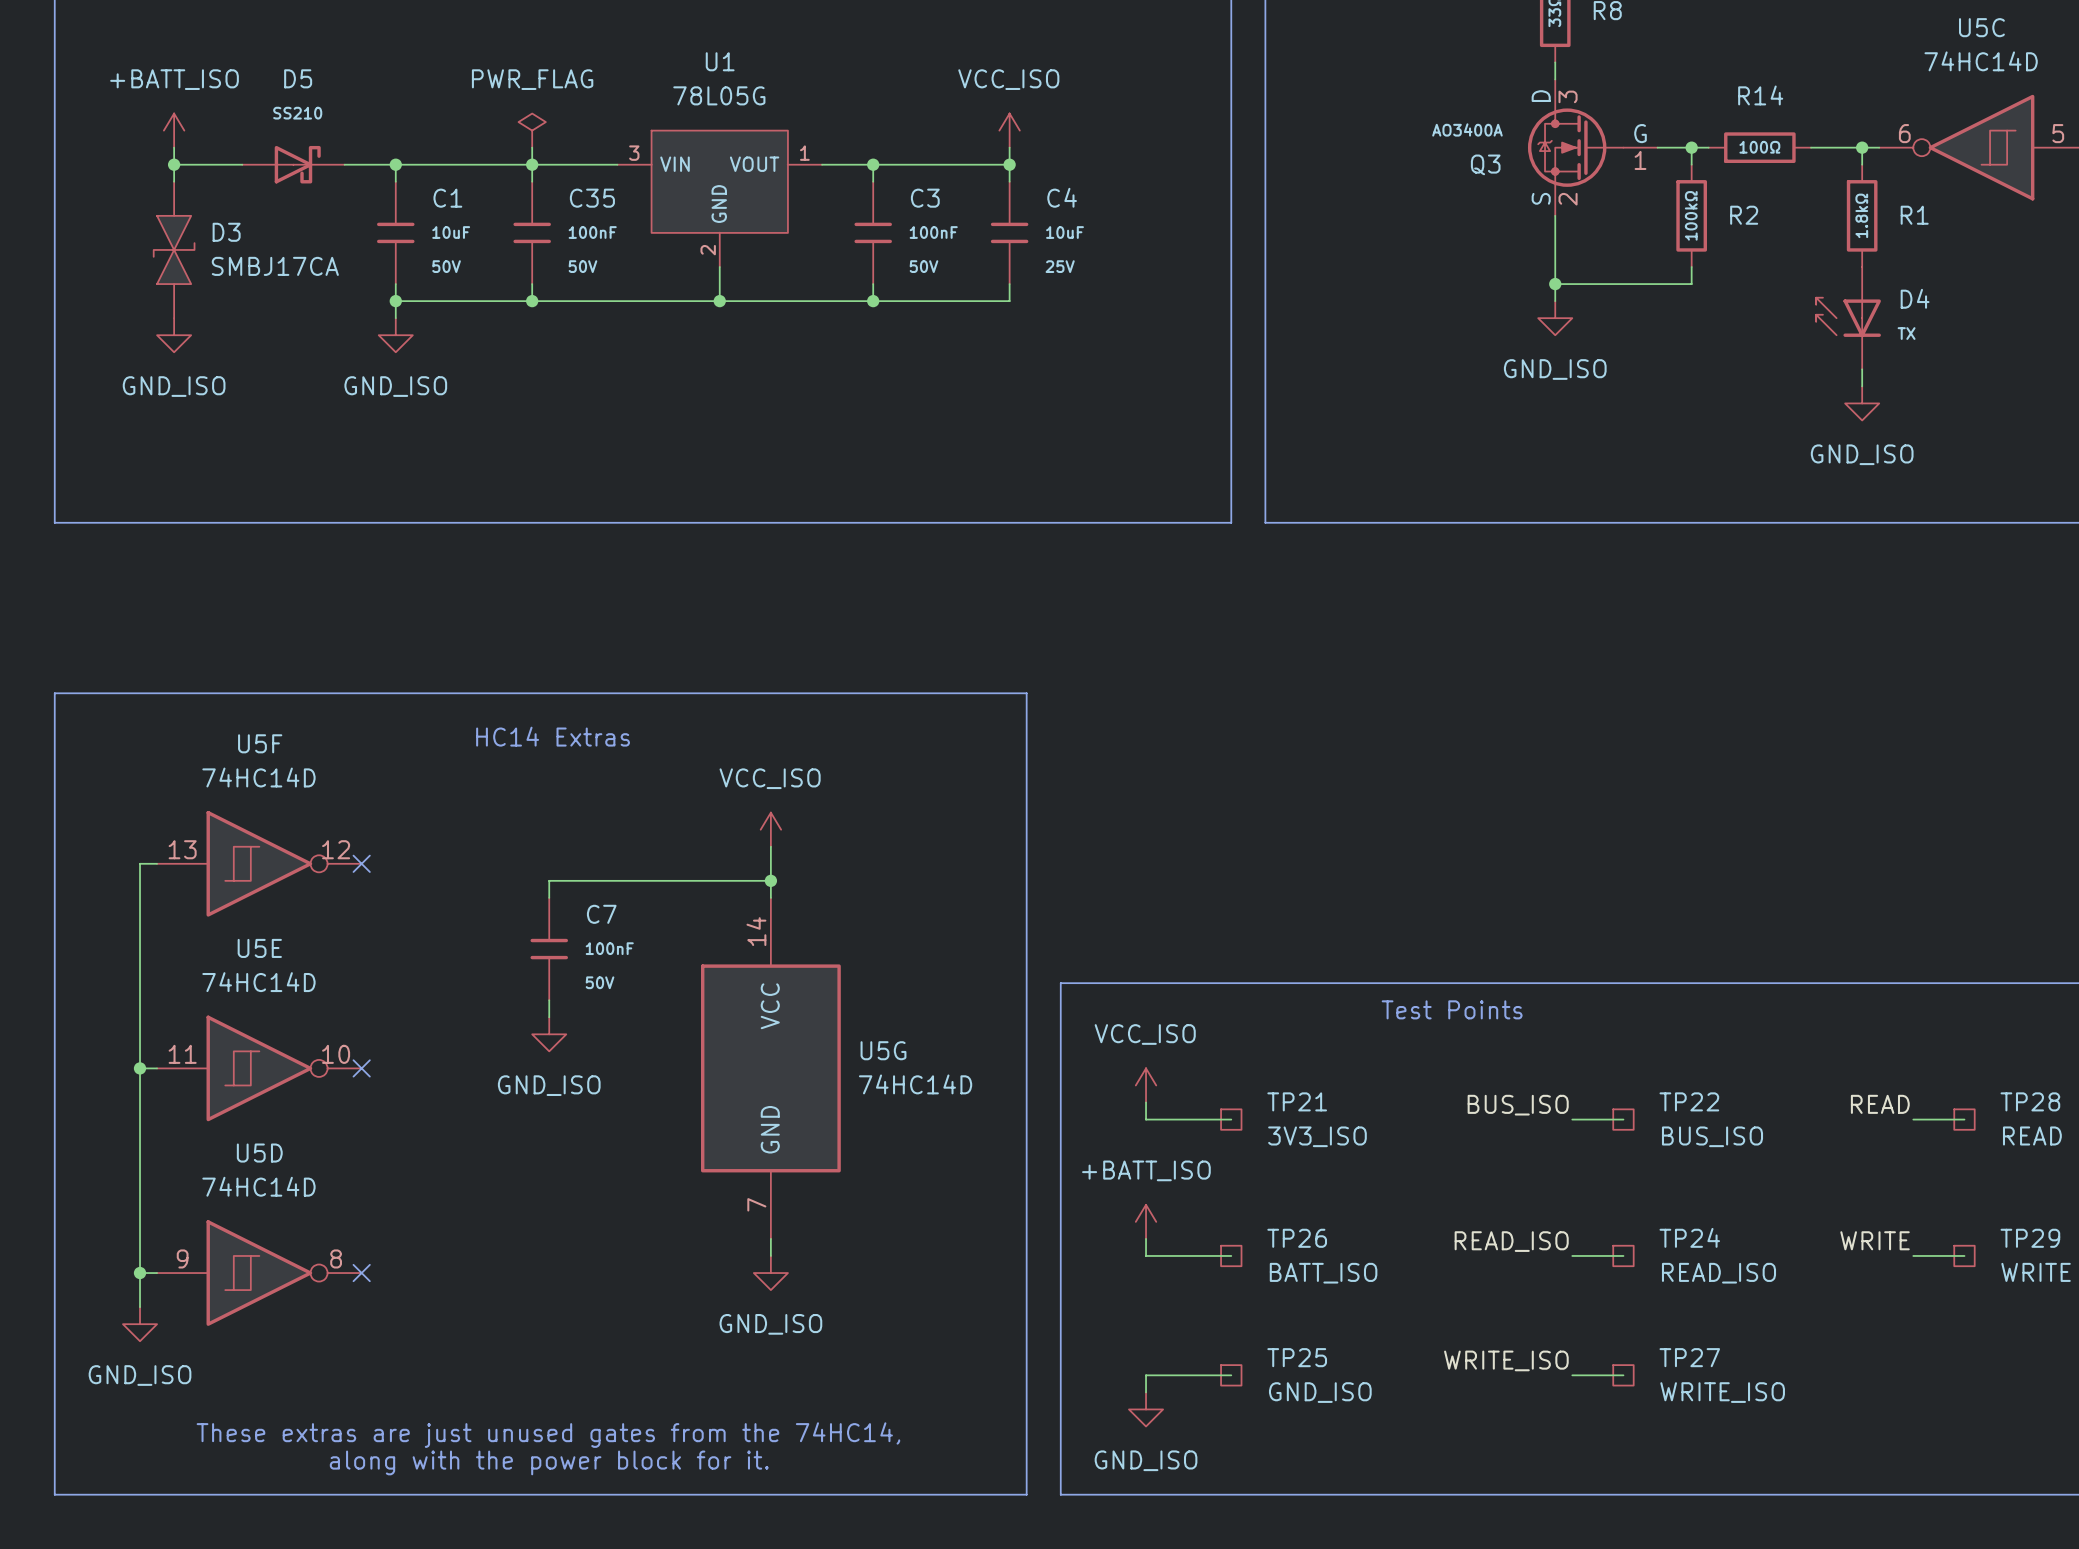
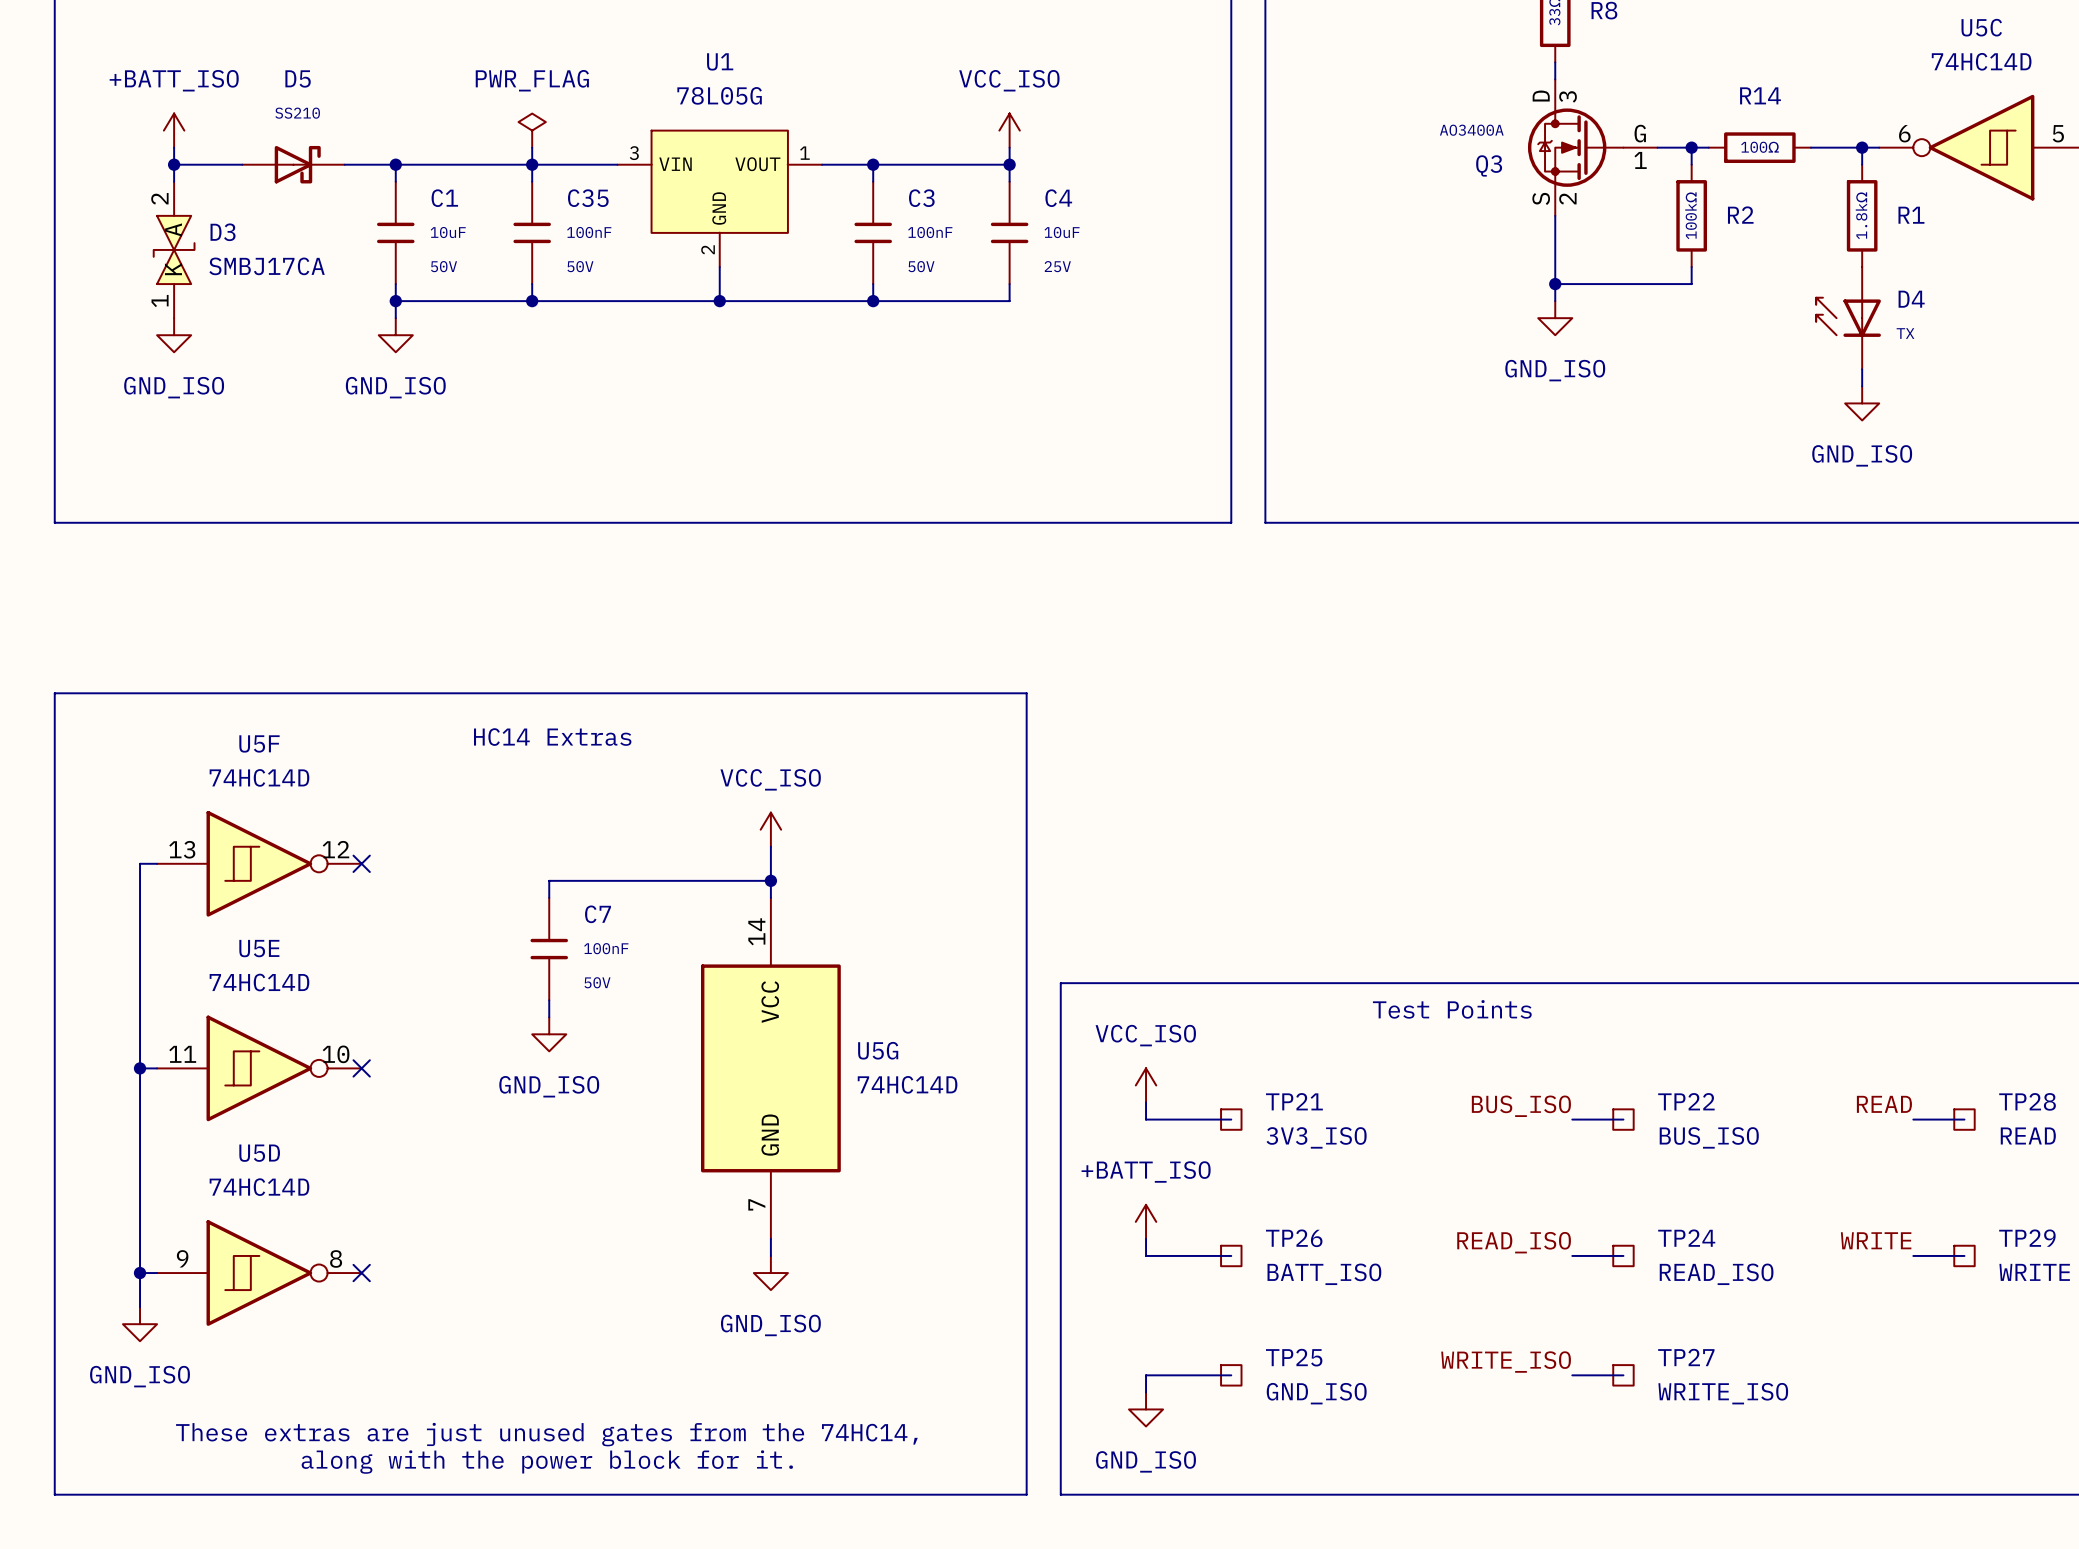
D3 pin number: none -> 2 (159, 198)
D3 pin name: none -> A (173, 230)
D3 pin name: none -> K (173, 269)
D3 pin number: none -> 1 (160, 301)

